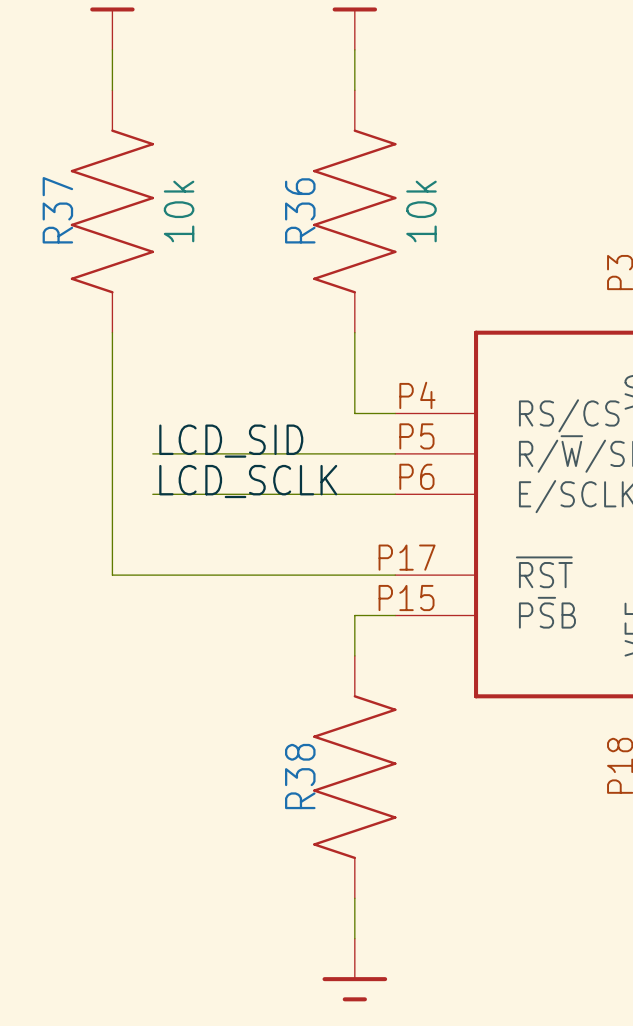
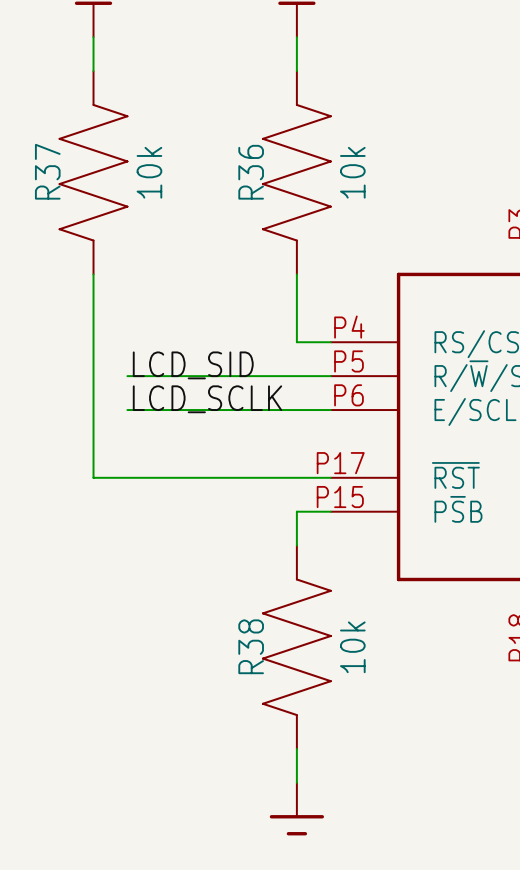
R38 value: none -> 10k (352, 647)

